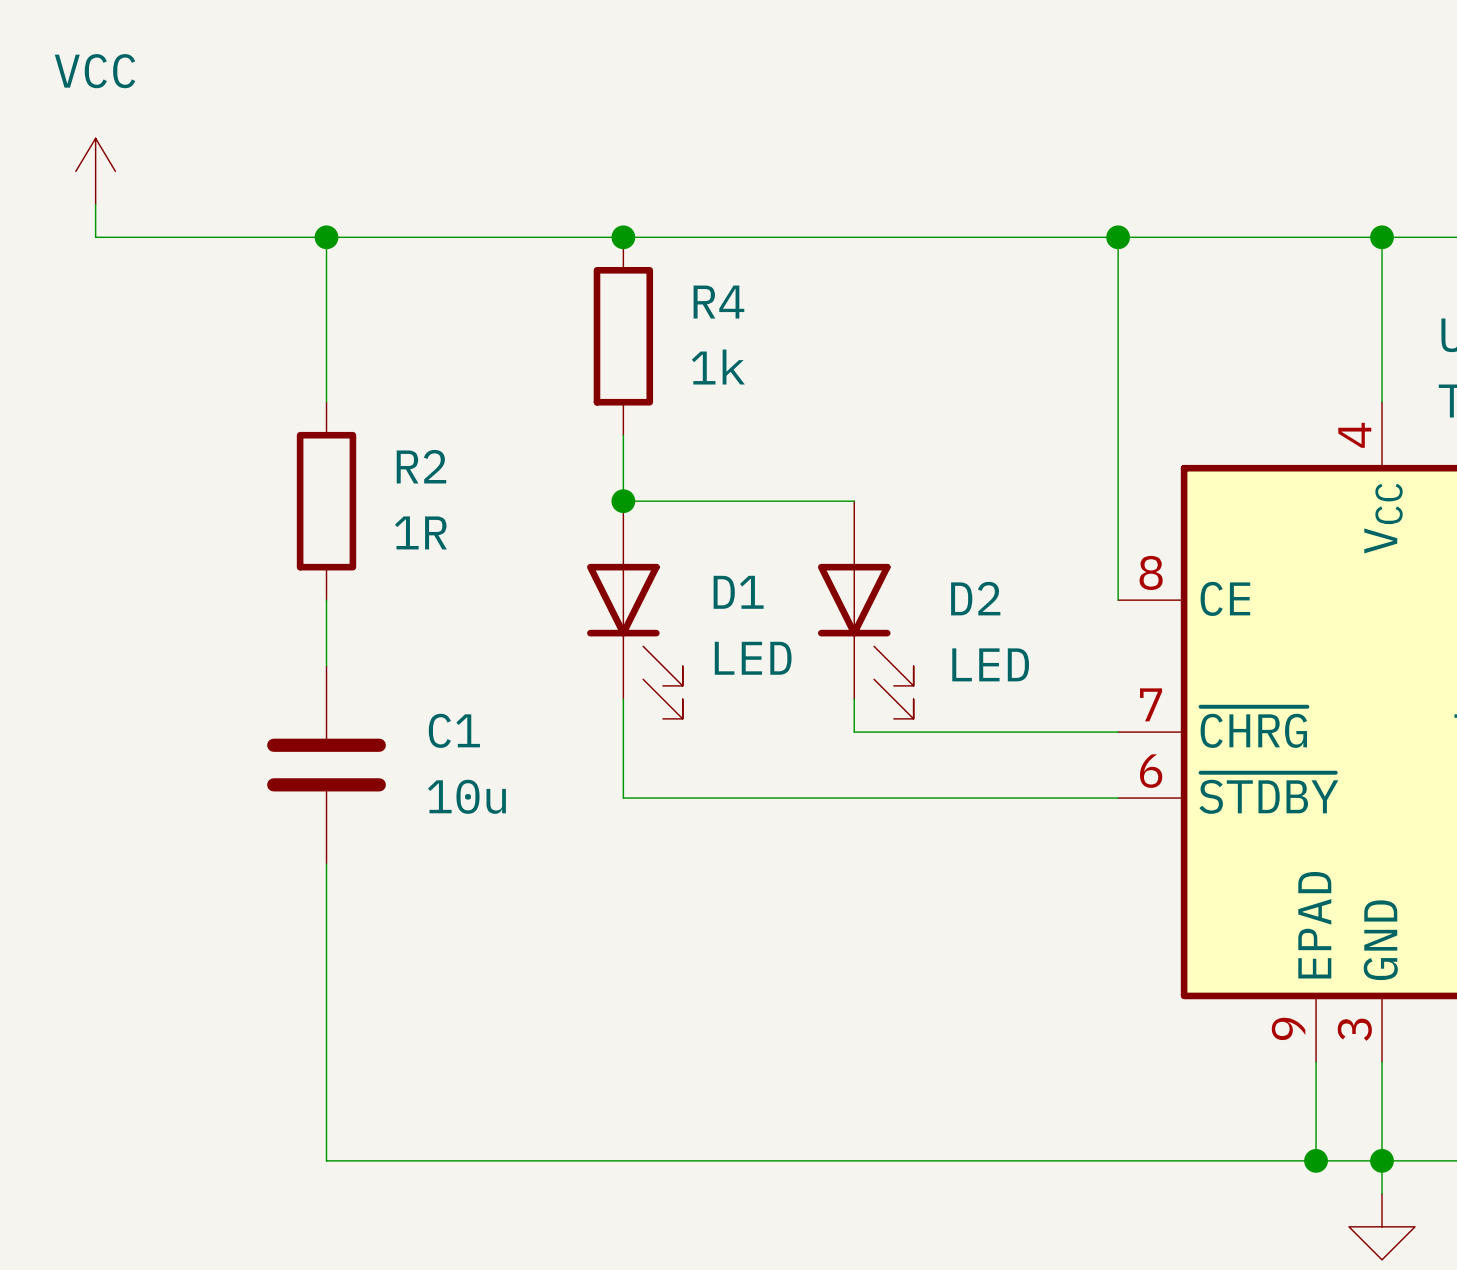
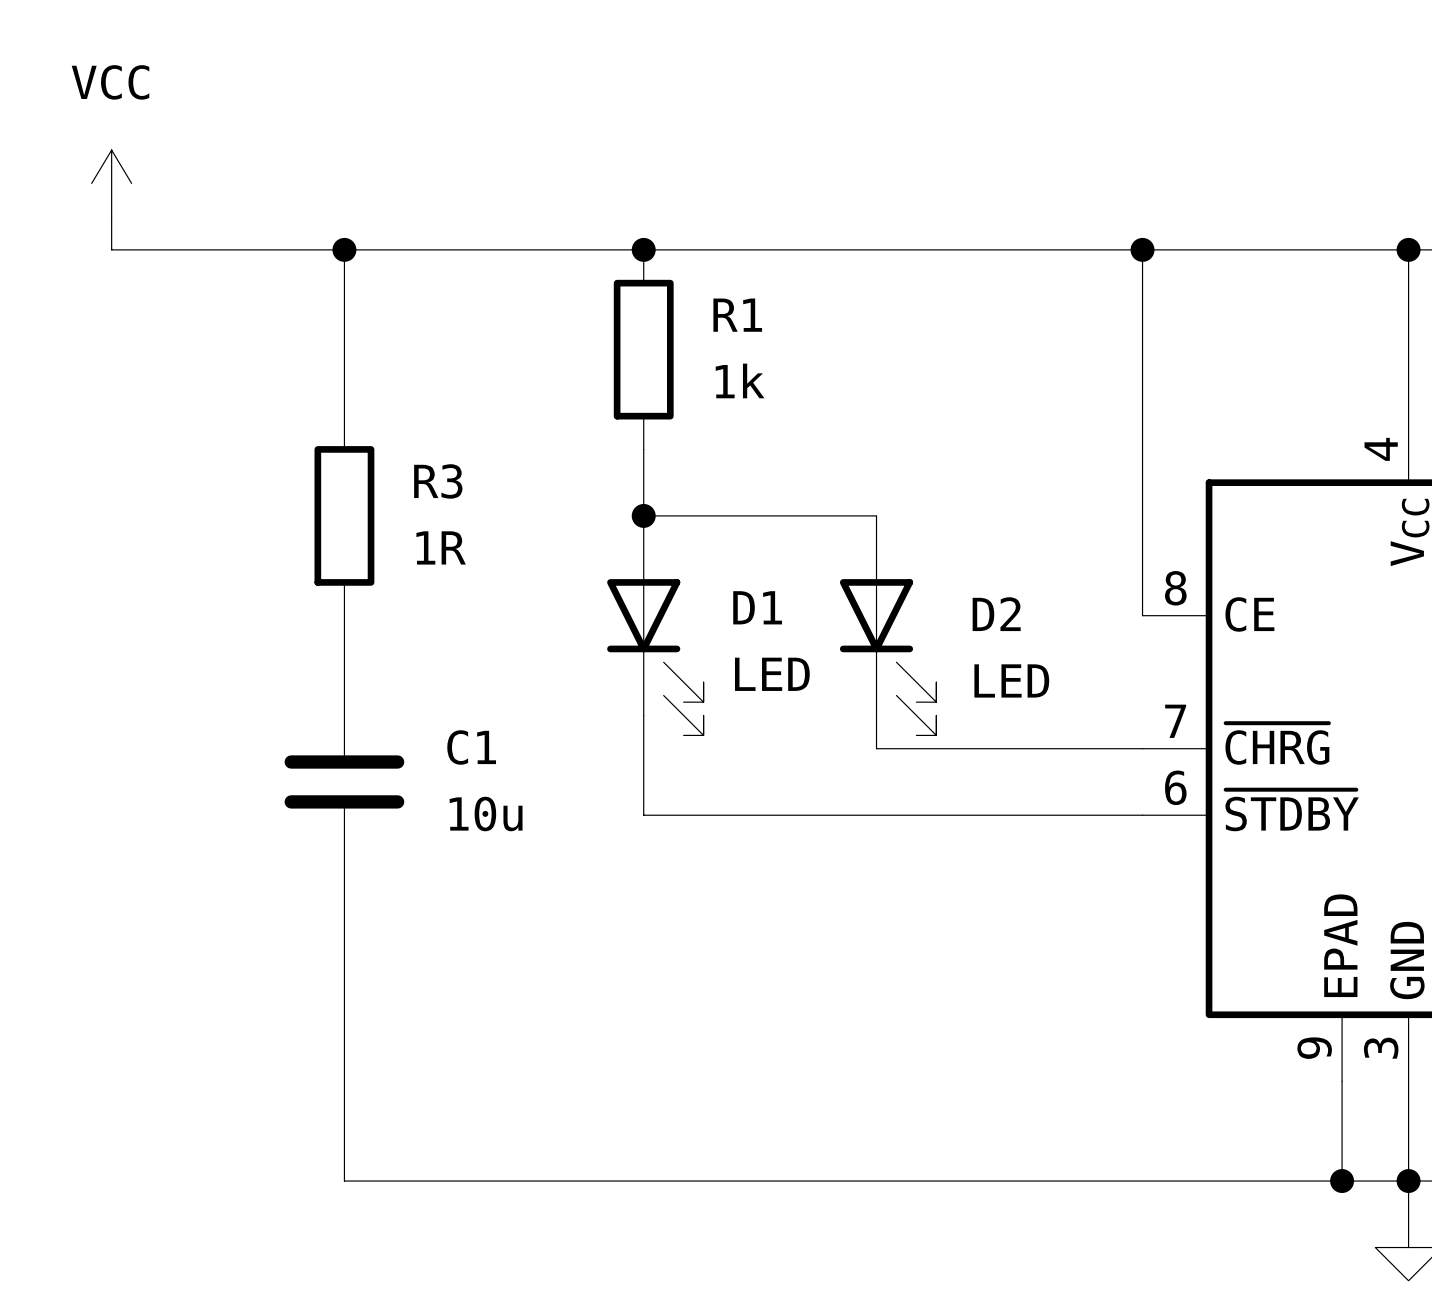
R4 name: R4 (718, 302) -> R1 (737, 315)
R2 name: R2 (421, 466) -> R3 (438, 481)

